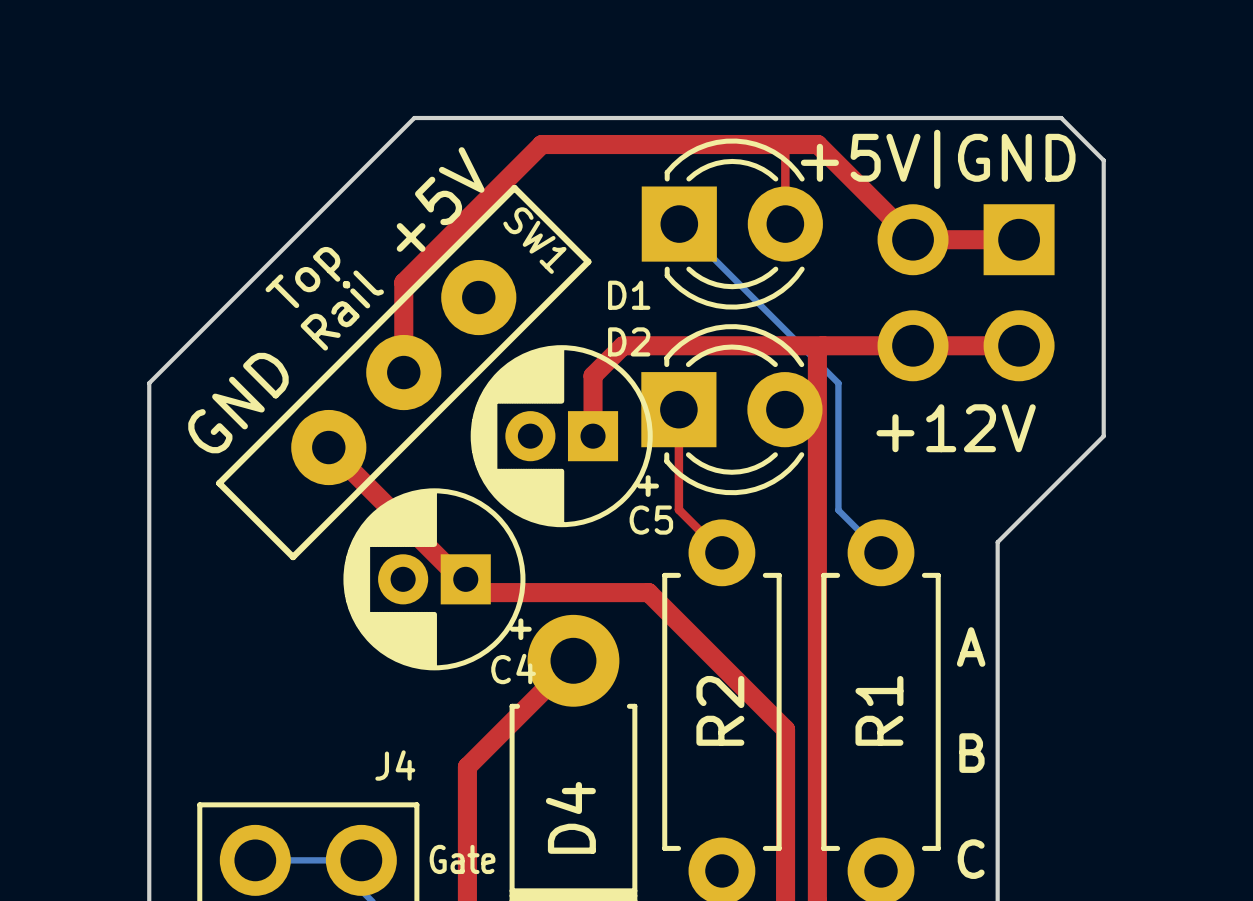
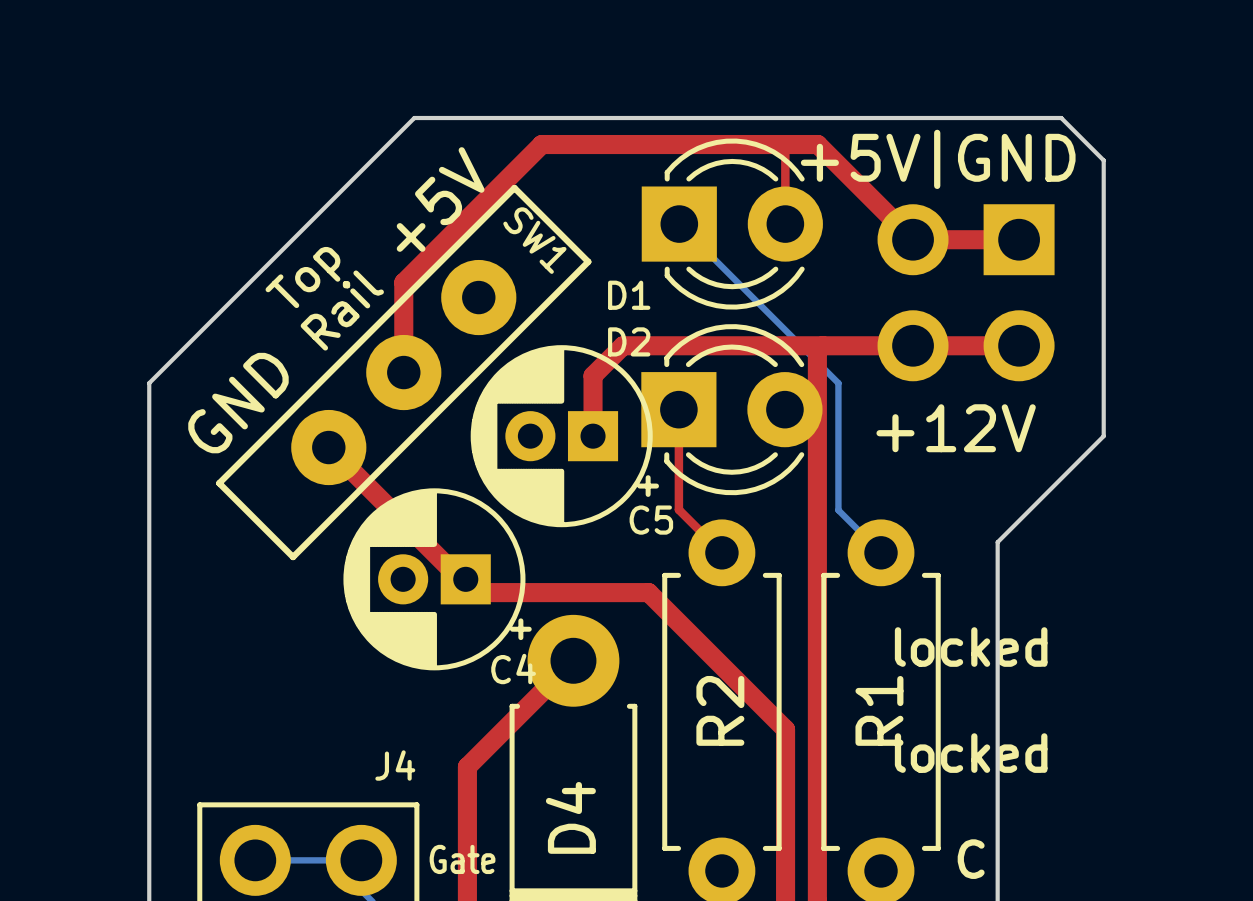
text: A (971, 647) -> locked (971, 647)
text: B (971, 753) -> locked (971, 753)

